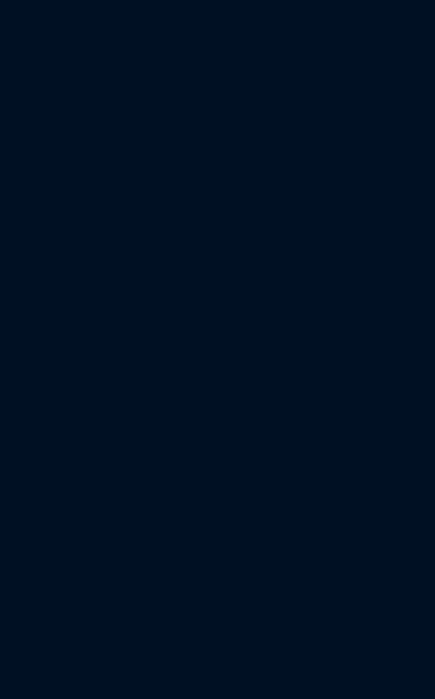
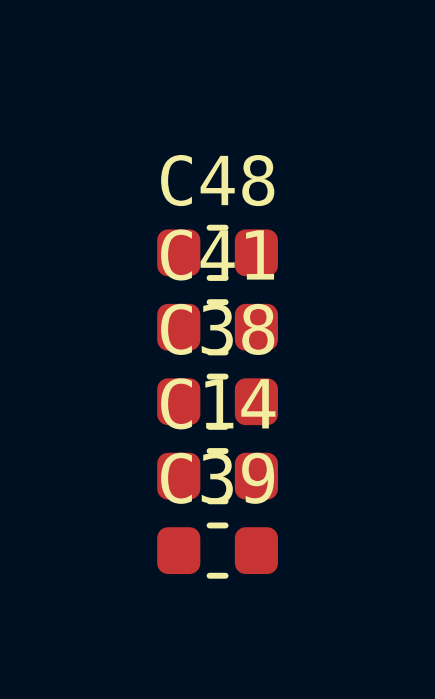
C48: none -> (217, 252)
C41: none -> (217, 327)
C38: none -> (217, 401)
C14: none -> (217, 476)
C39: none -> (217, 550)

